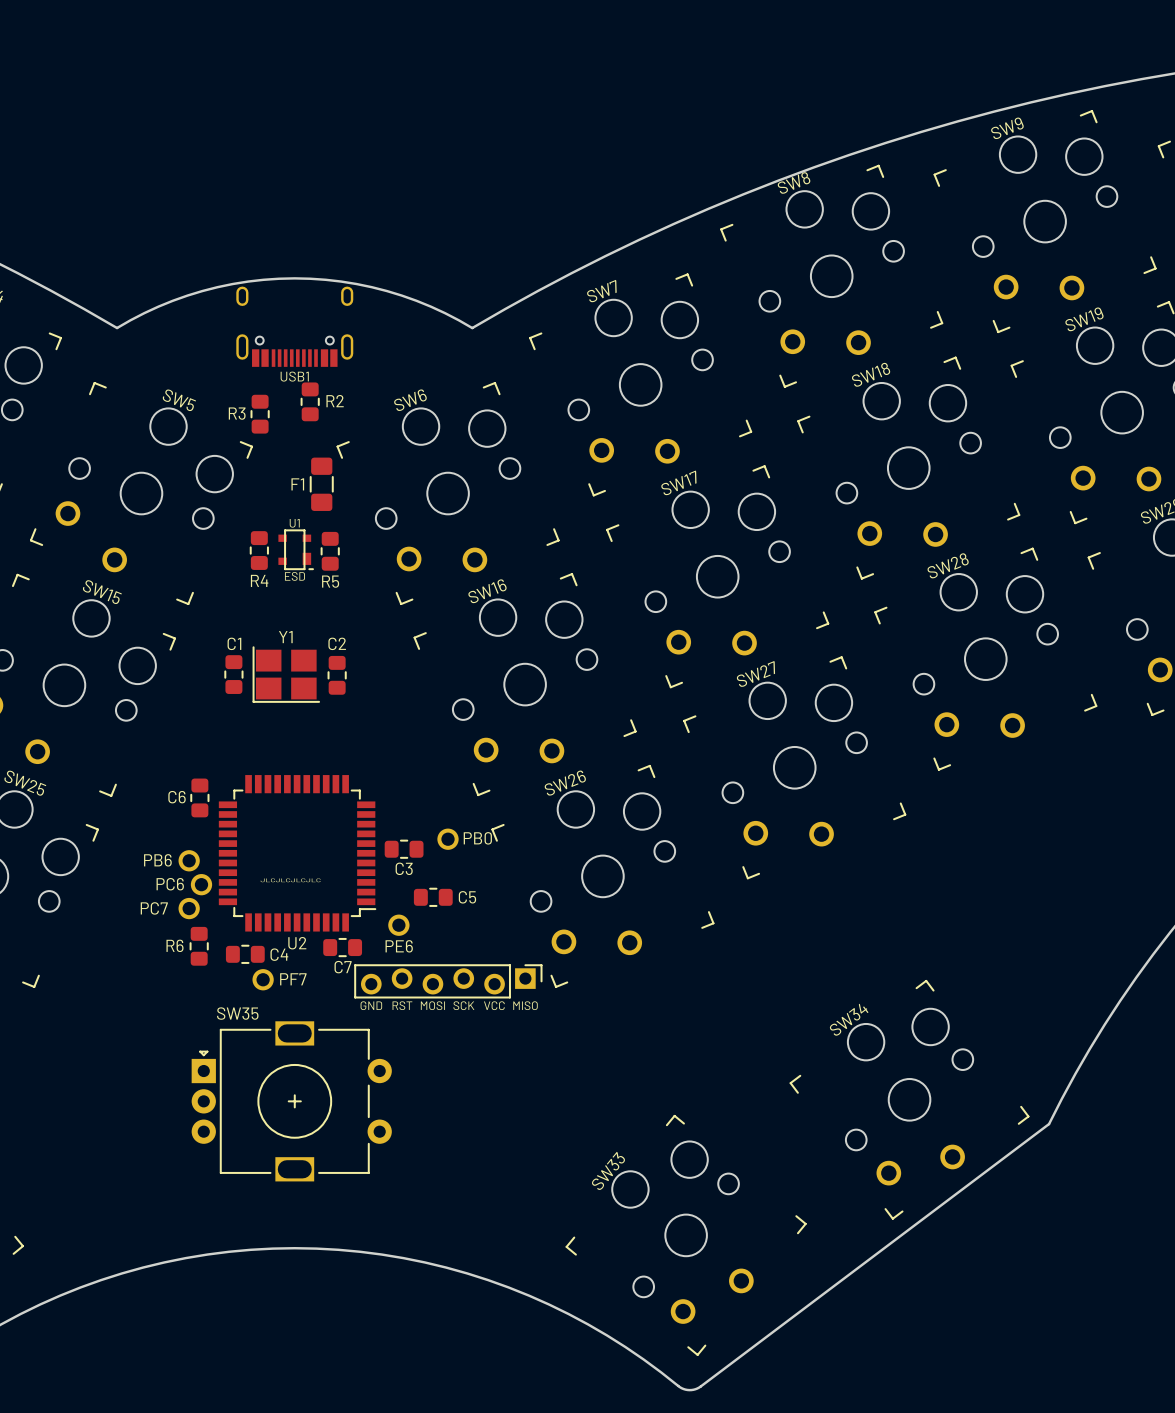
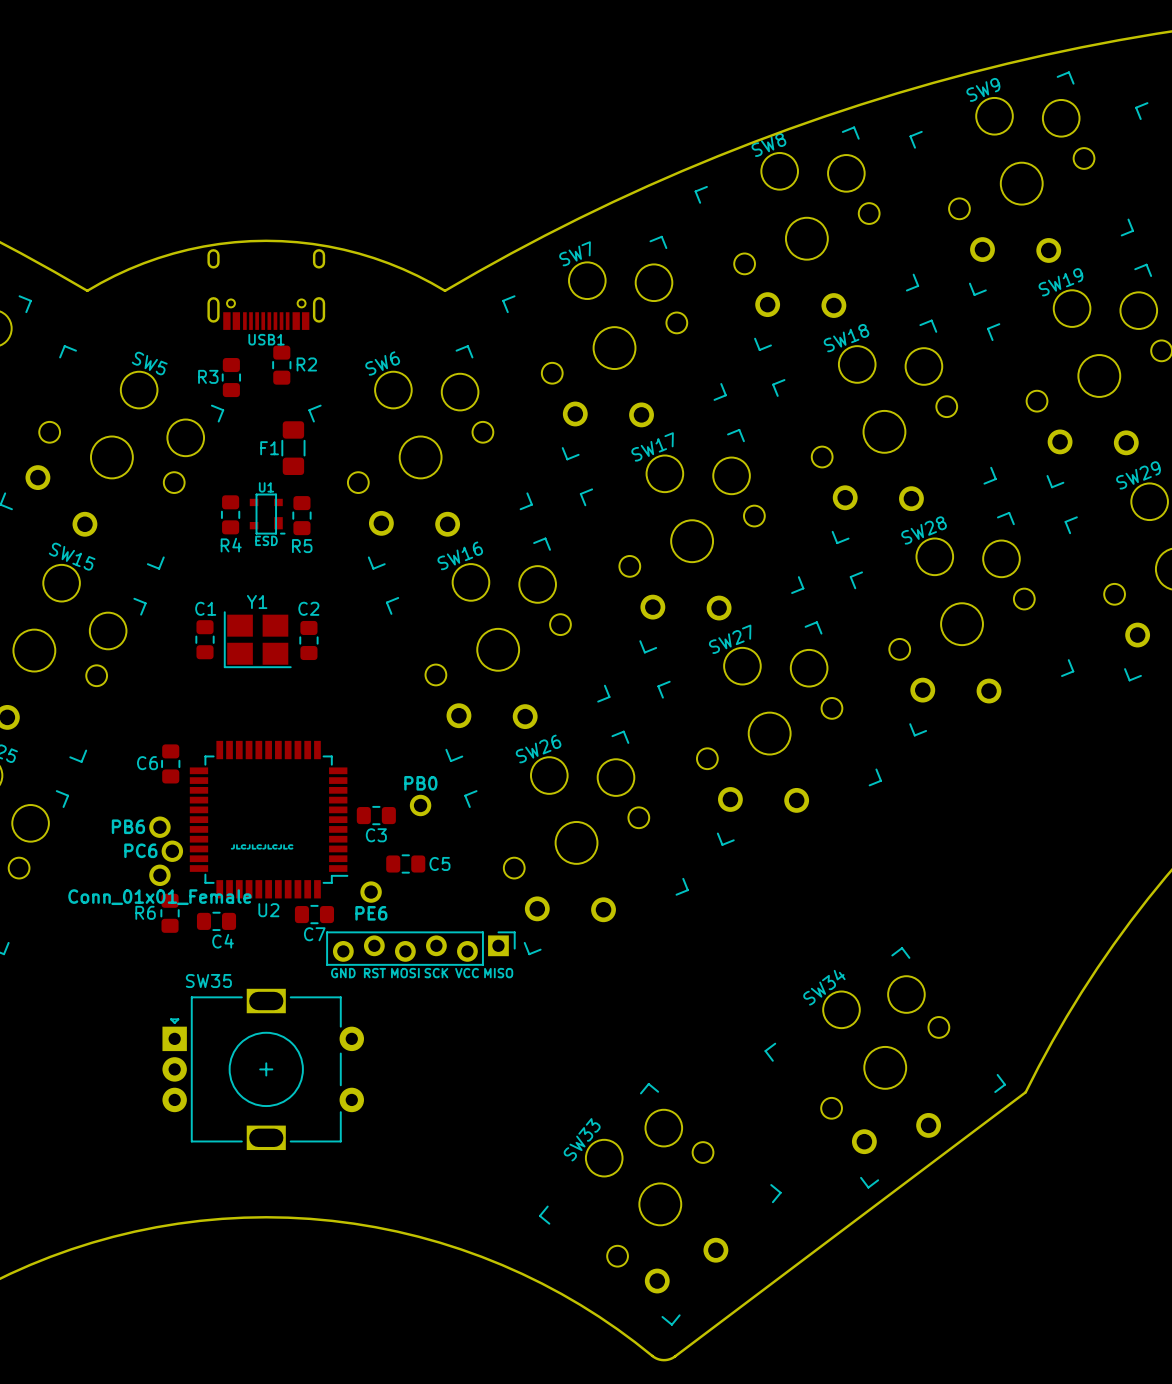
part value position: PB0 (477, 838) -> PB0 (420, 783)
part value: PC7 (154, 908) -> Conn_01x01_Female (159, 897)
C4 name position: C4 (279, 954) -> C4 (223, 941)
part: PF7 (263, 979) -> none

